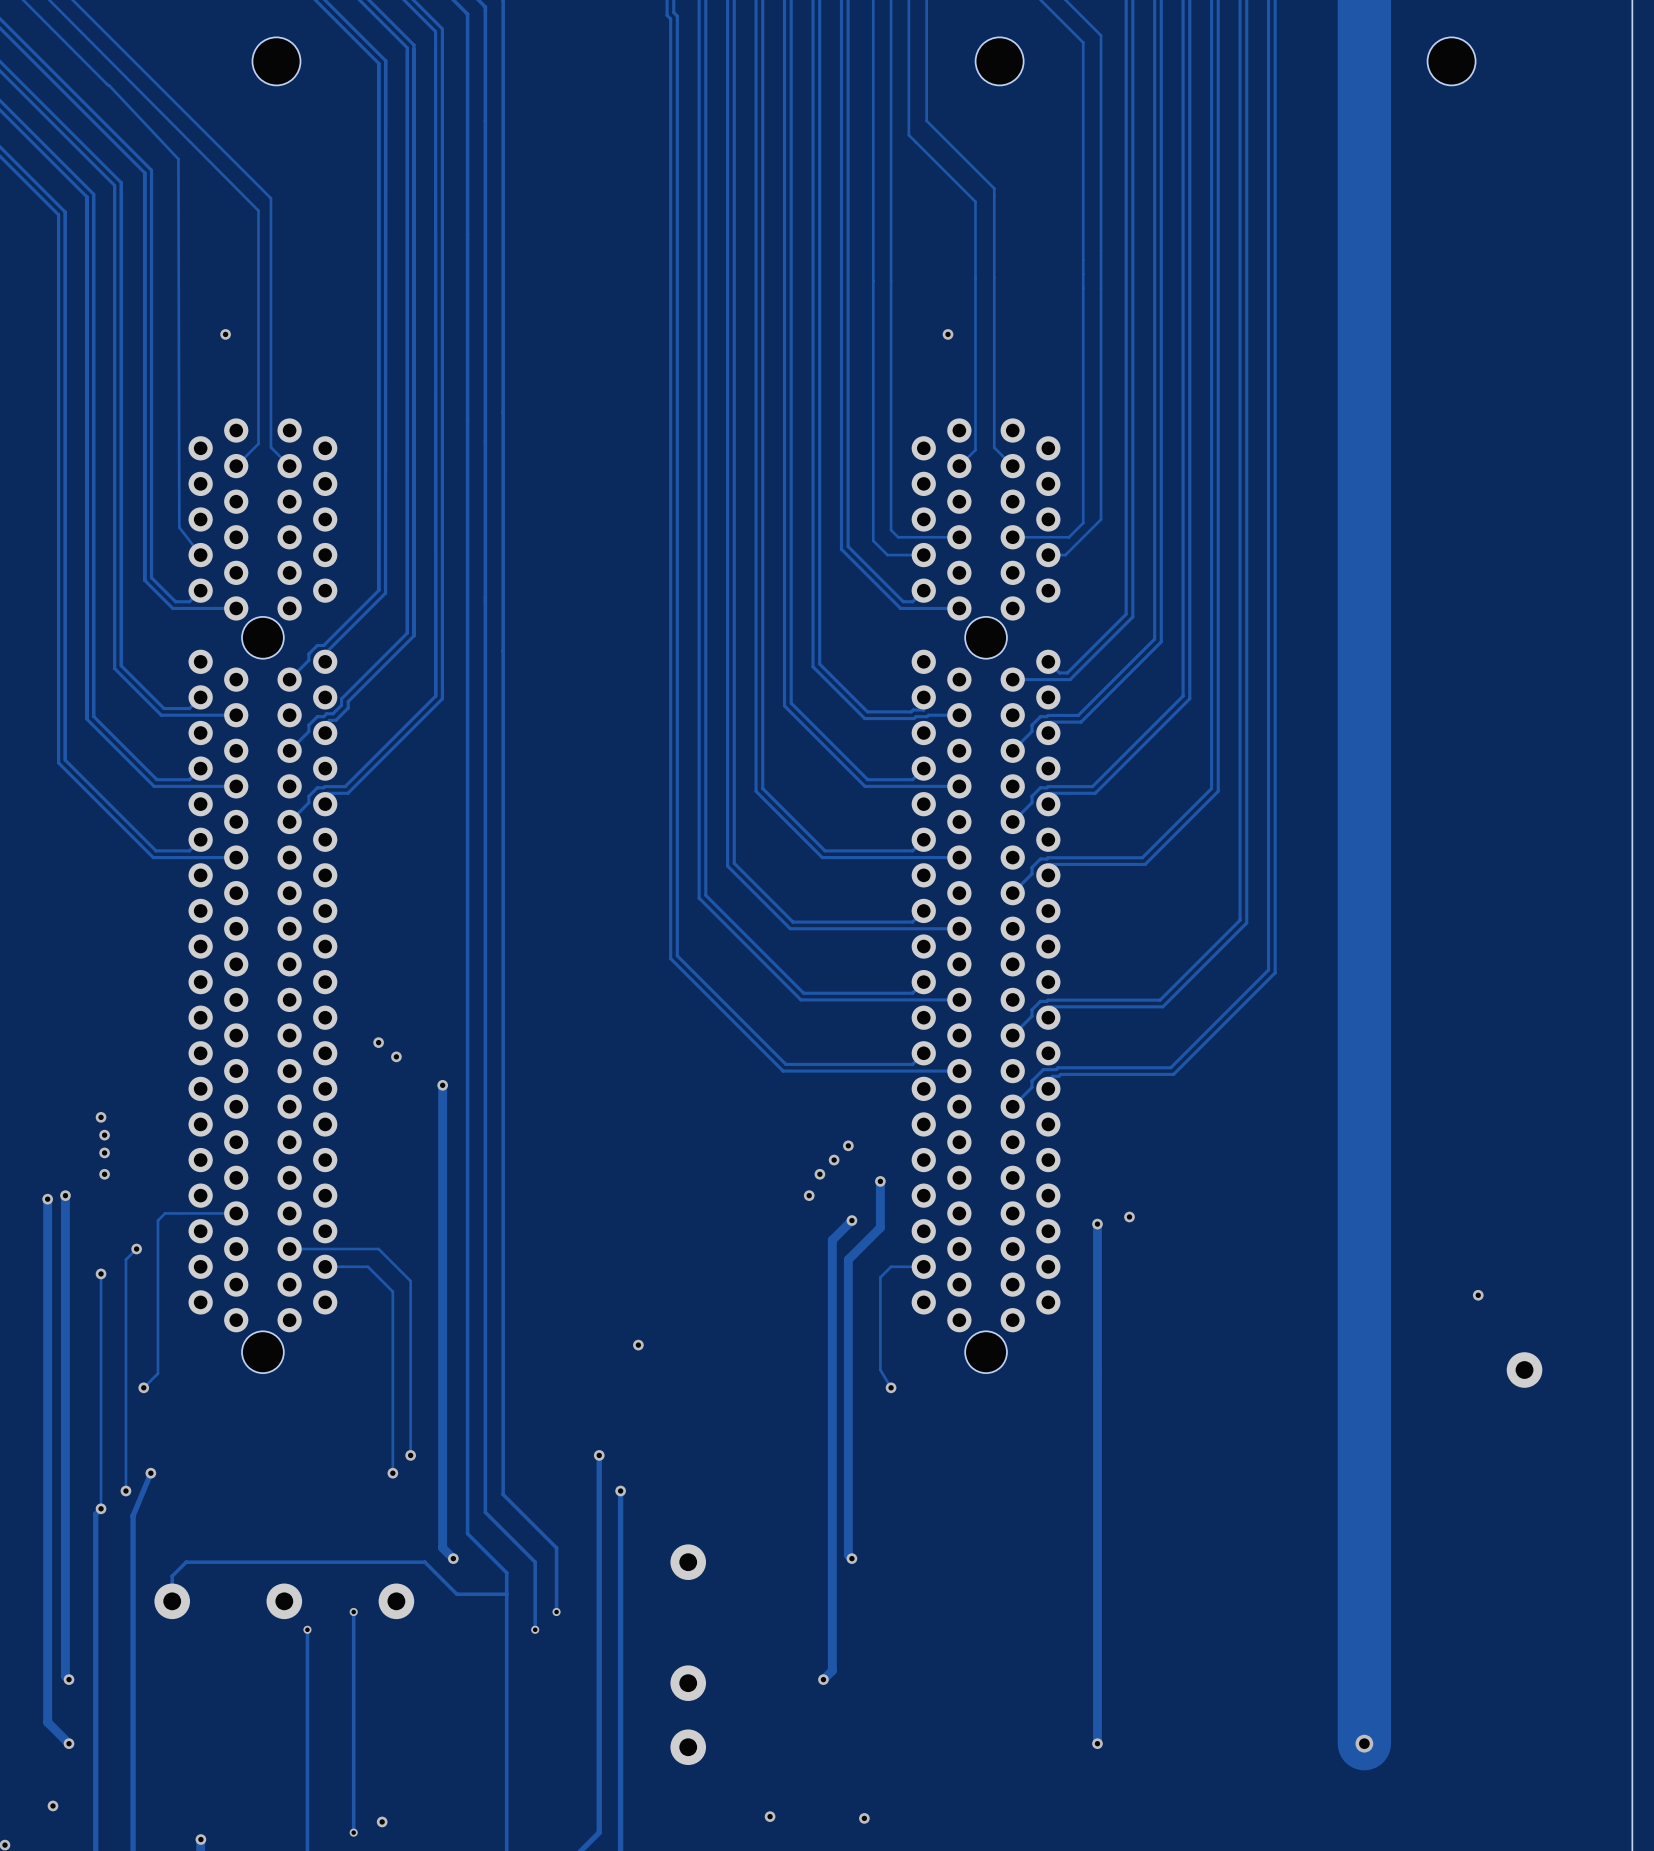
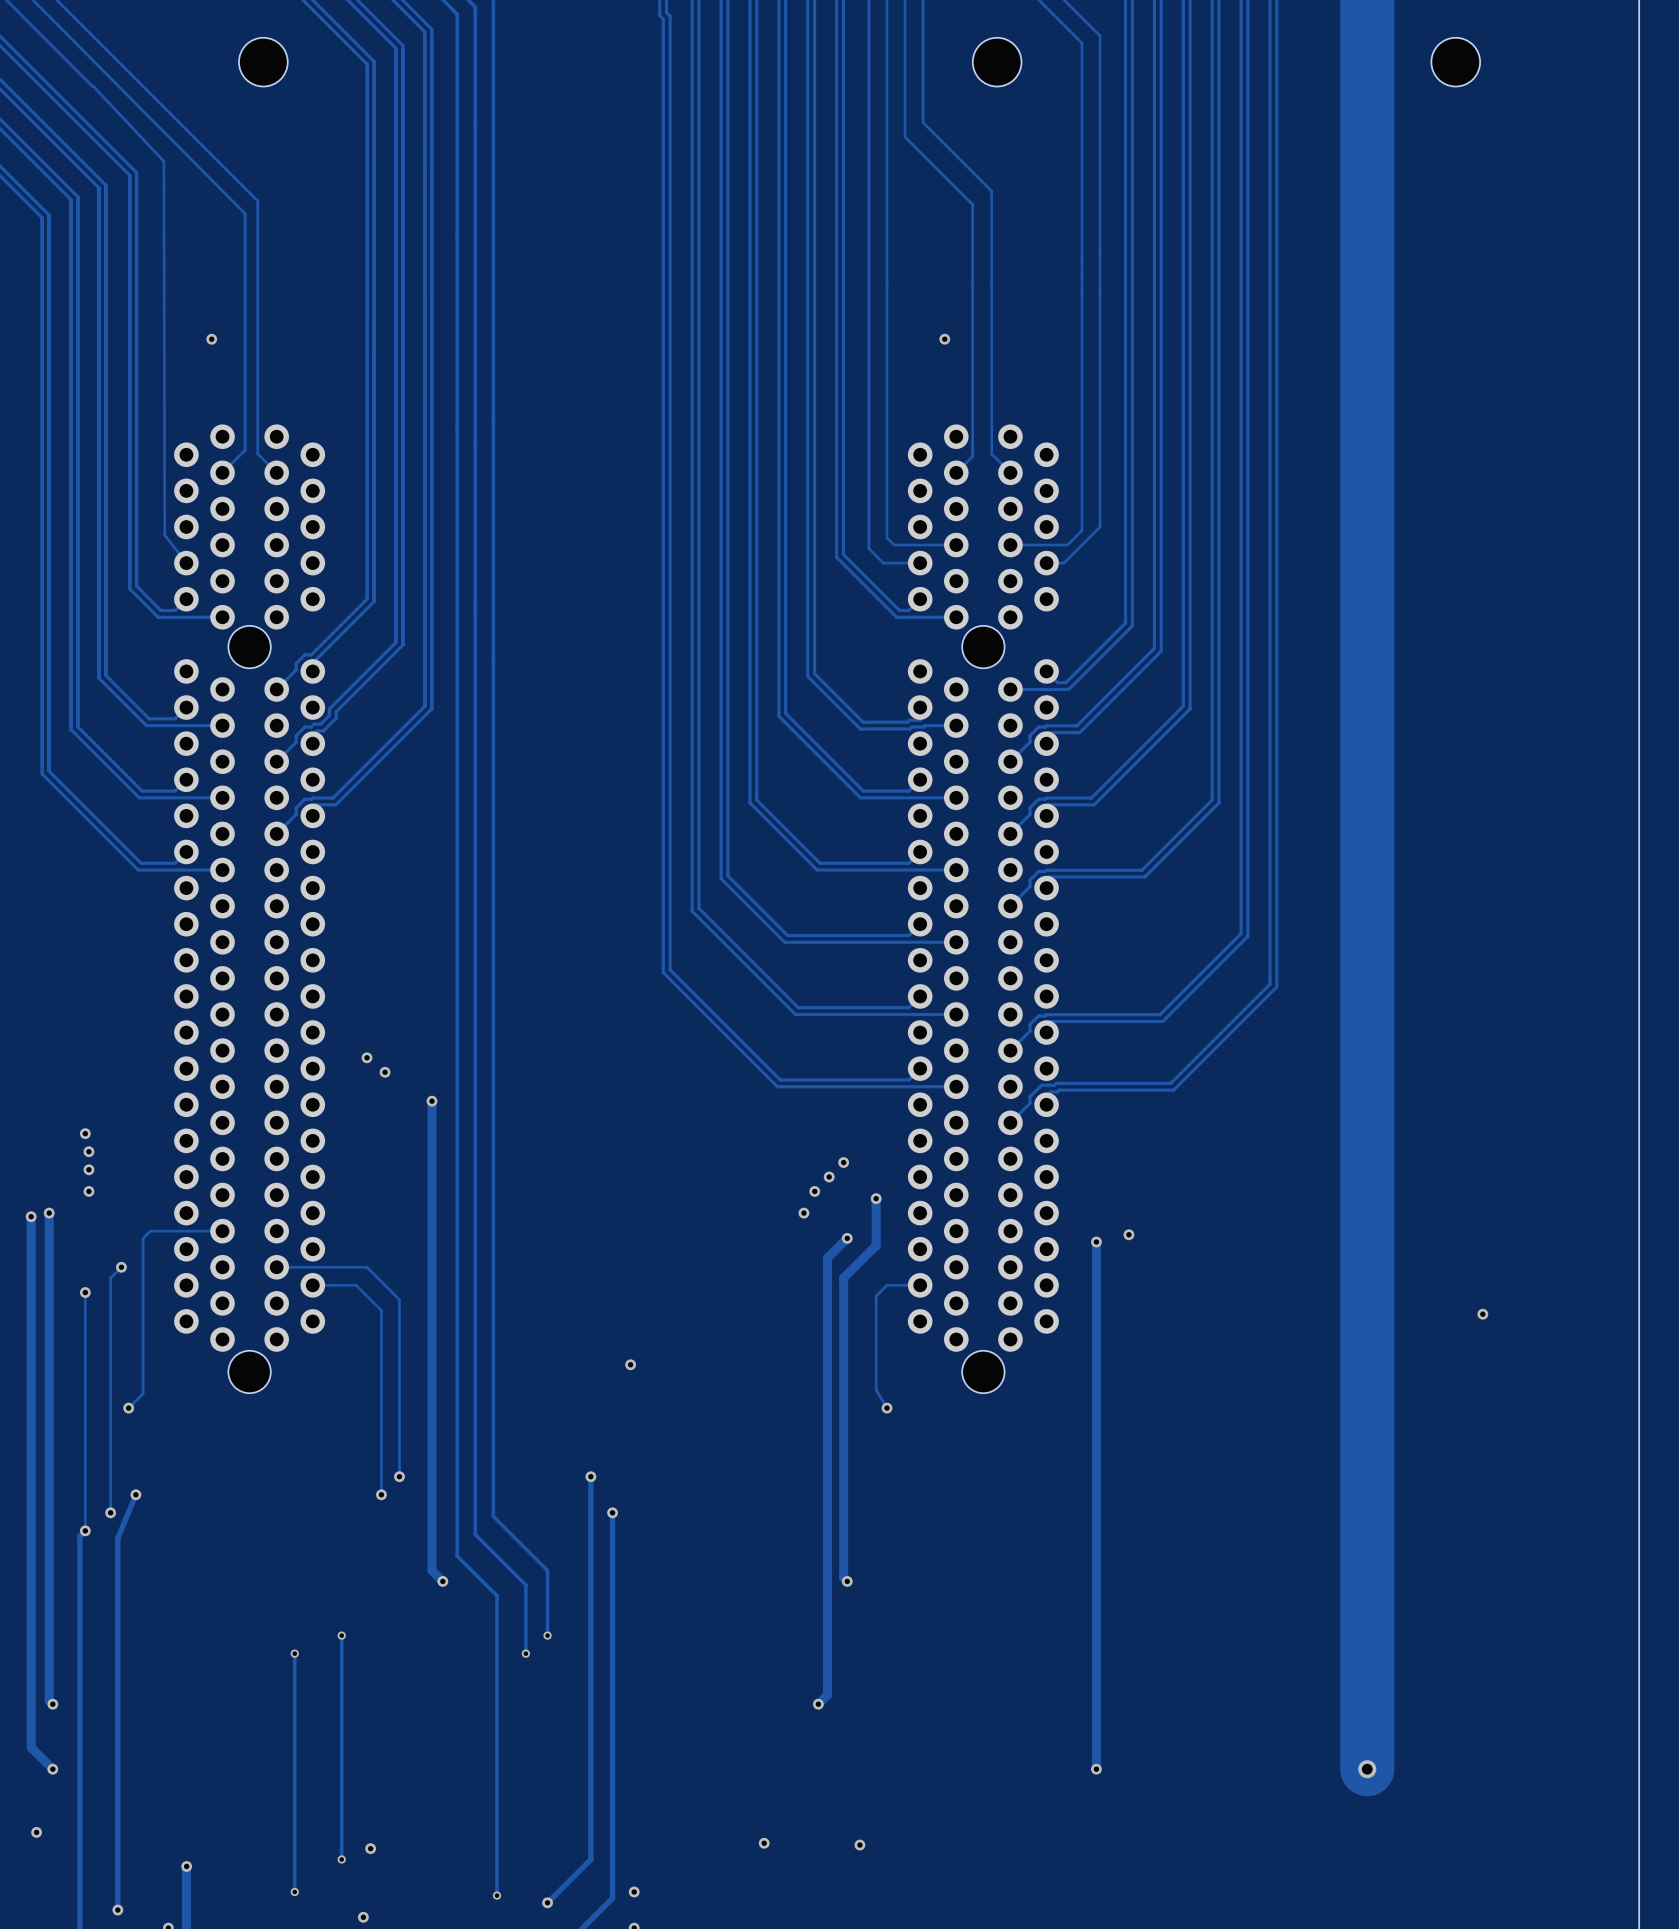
part: (1524, 1370) -> none
part: (688, 1562) -> none
track: (506, 1594) (456, 1594) (424, 1562) (186, 1562) (172, 1576) (172, 1601) -> none
part: (172, 1601) -> none
part: (284, 1601) -> none
part: (396, 1601) -> none
part: (688, 1683) -> none
part: (688, 1747) -> none

